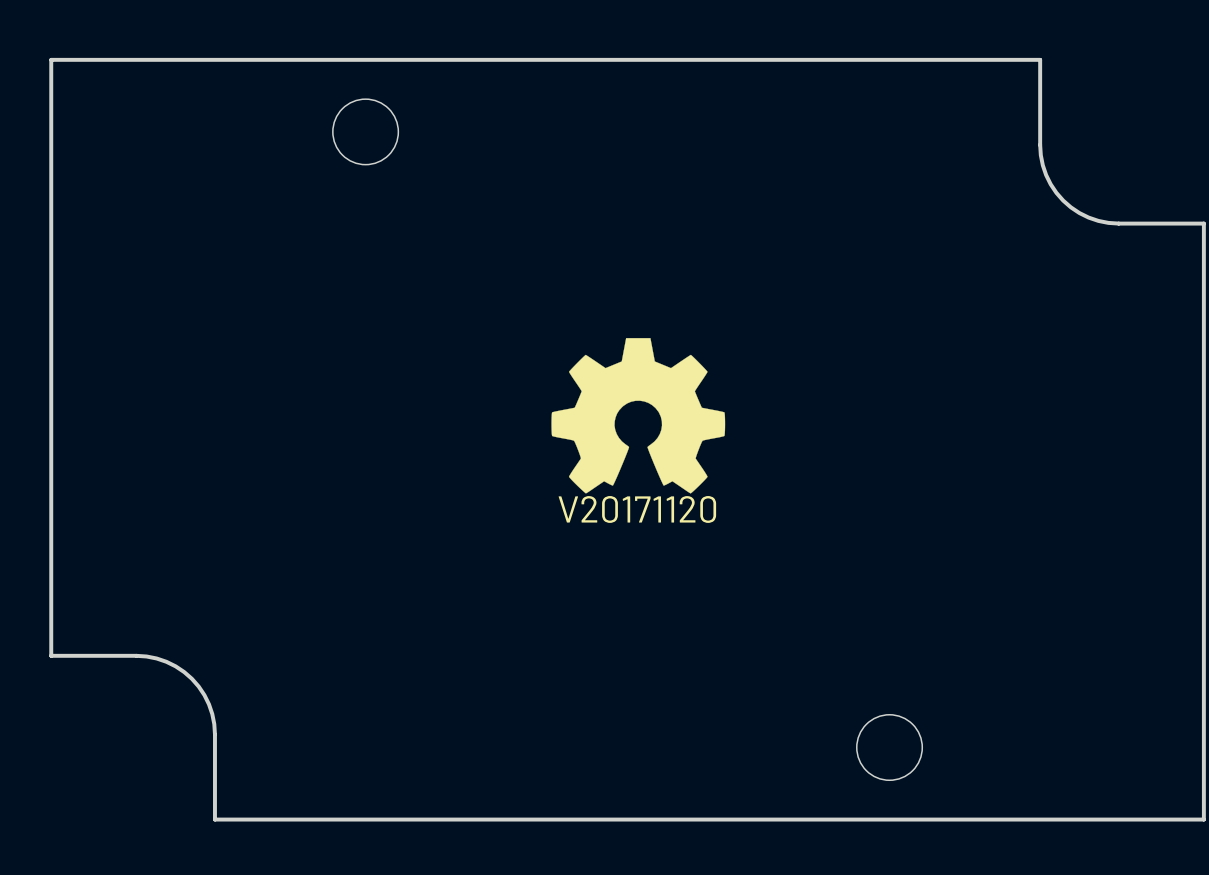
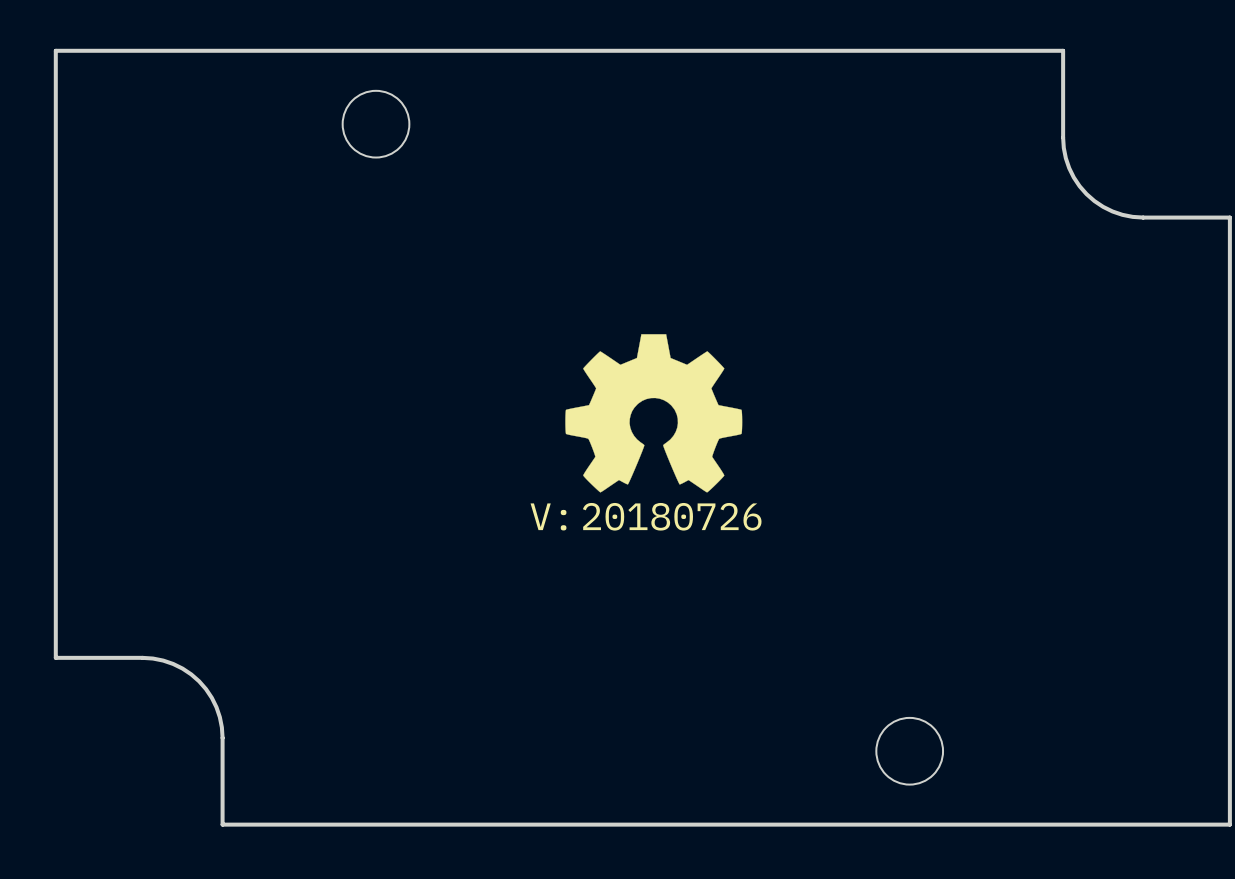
drawing shape: [558, 496, 717, 523] -> [530, 502, 762, 531]

